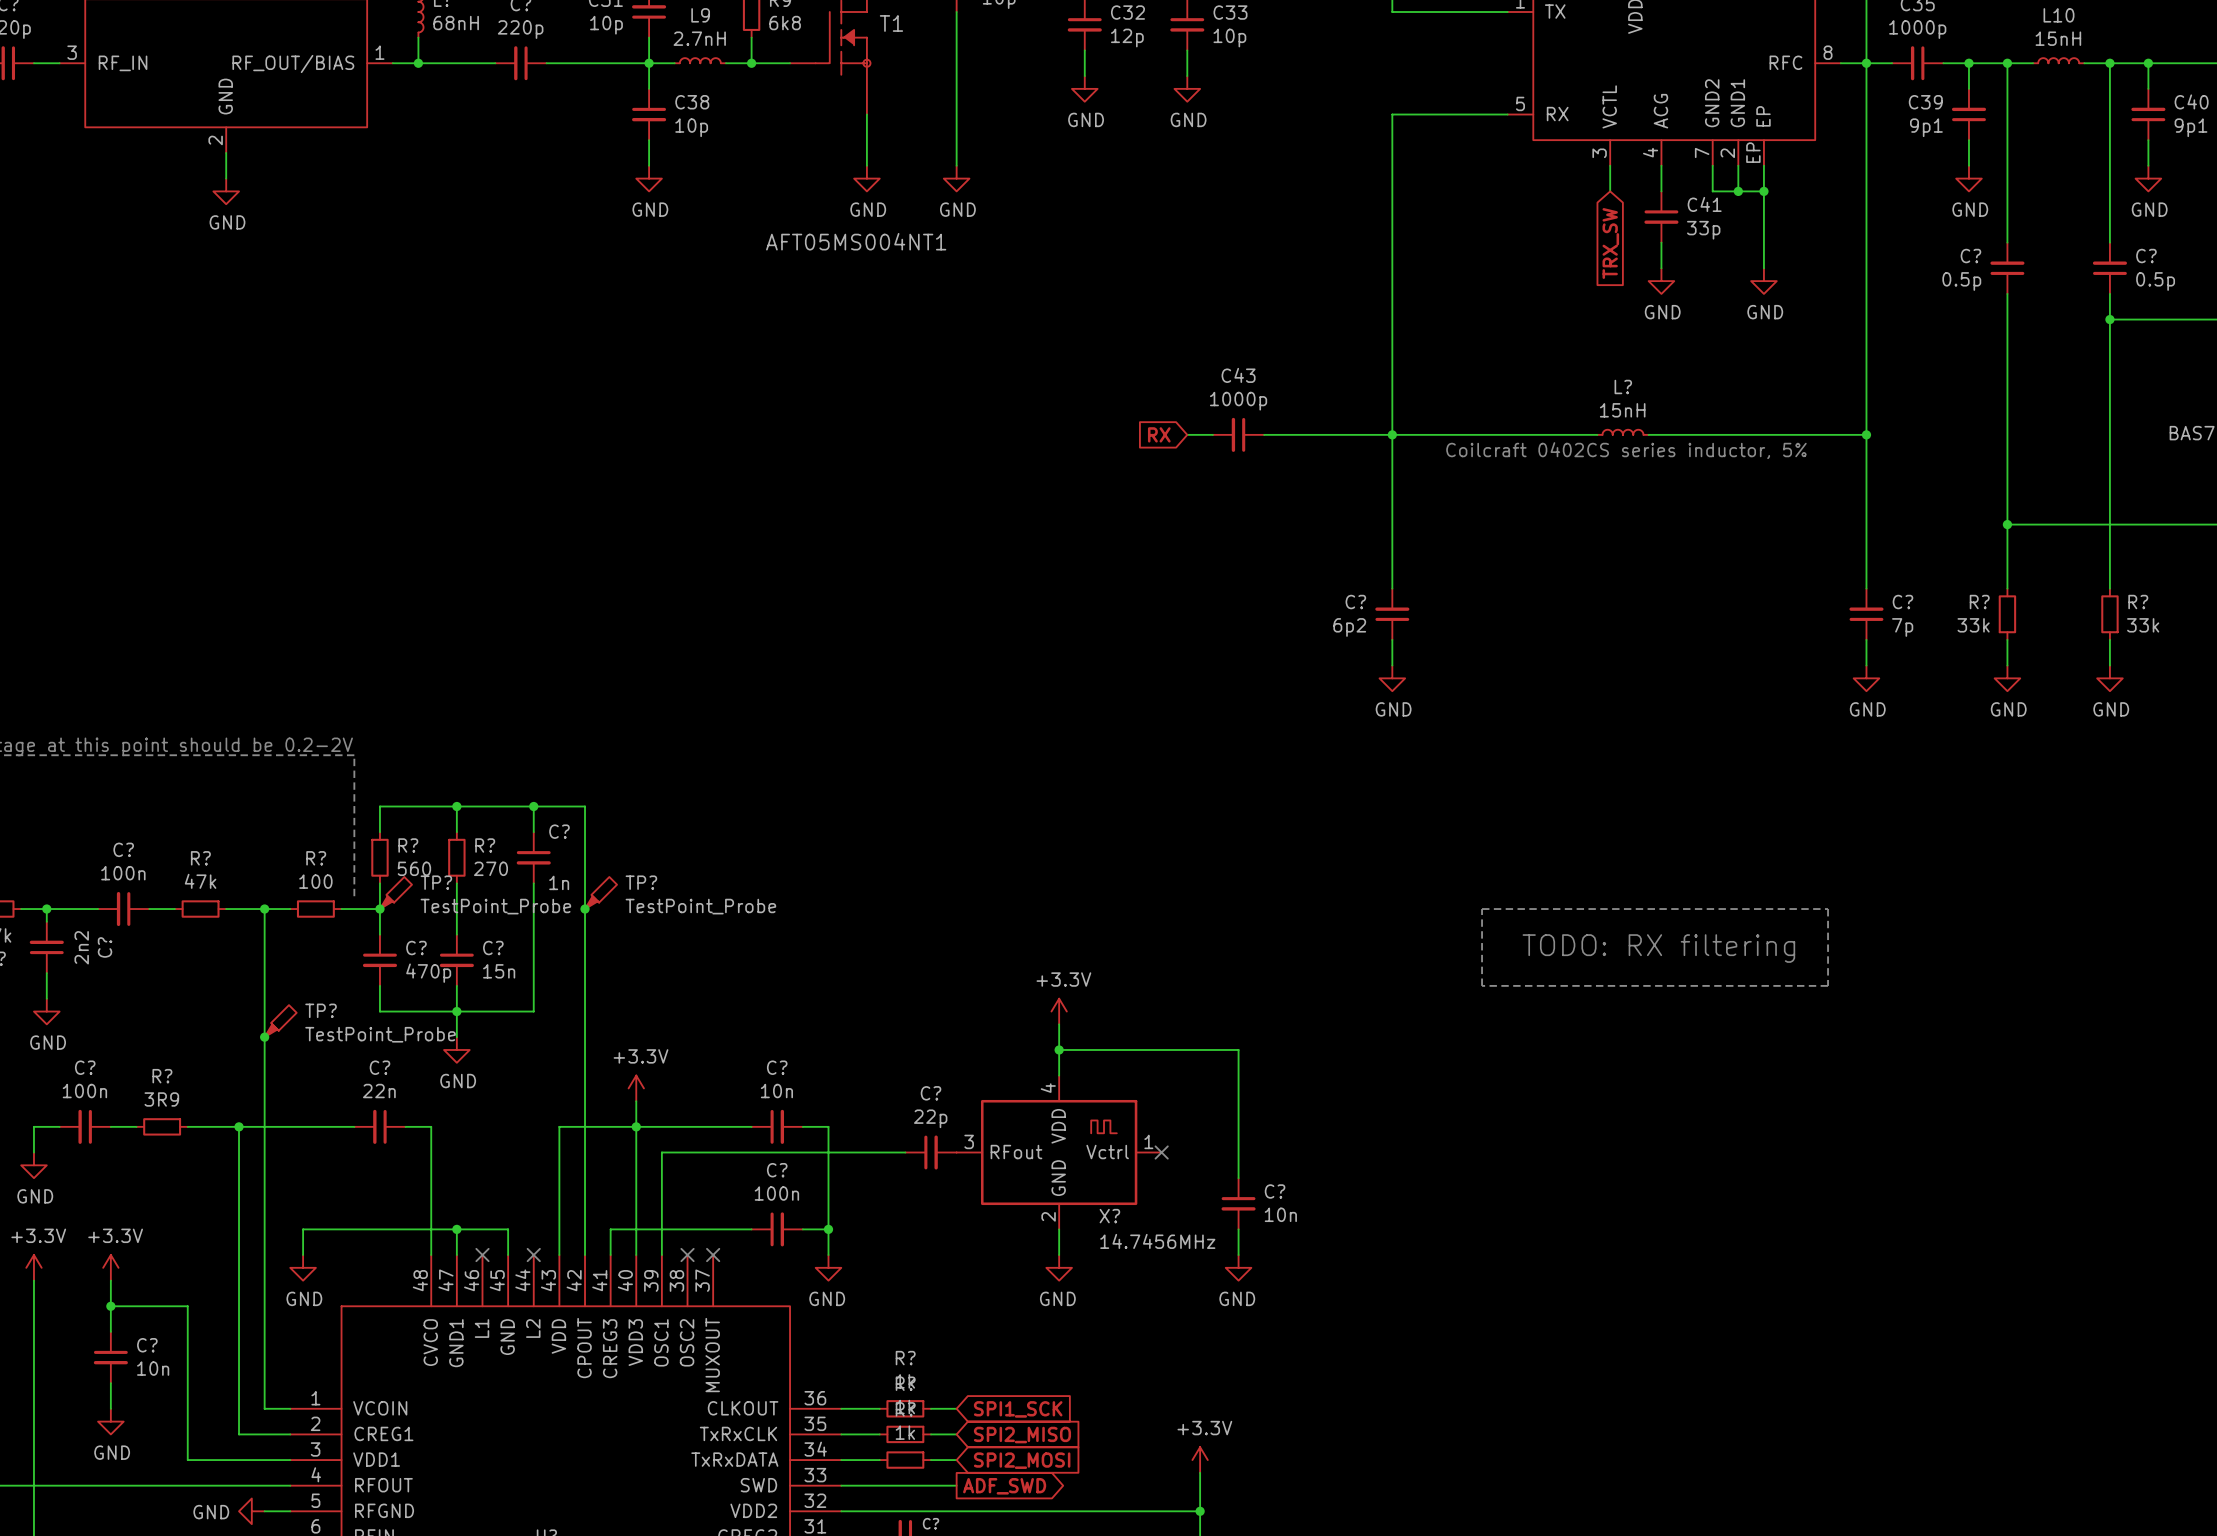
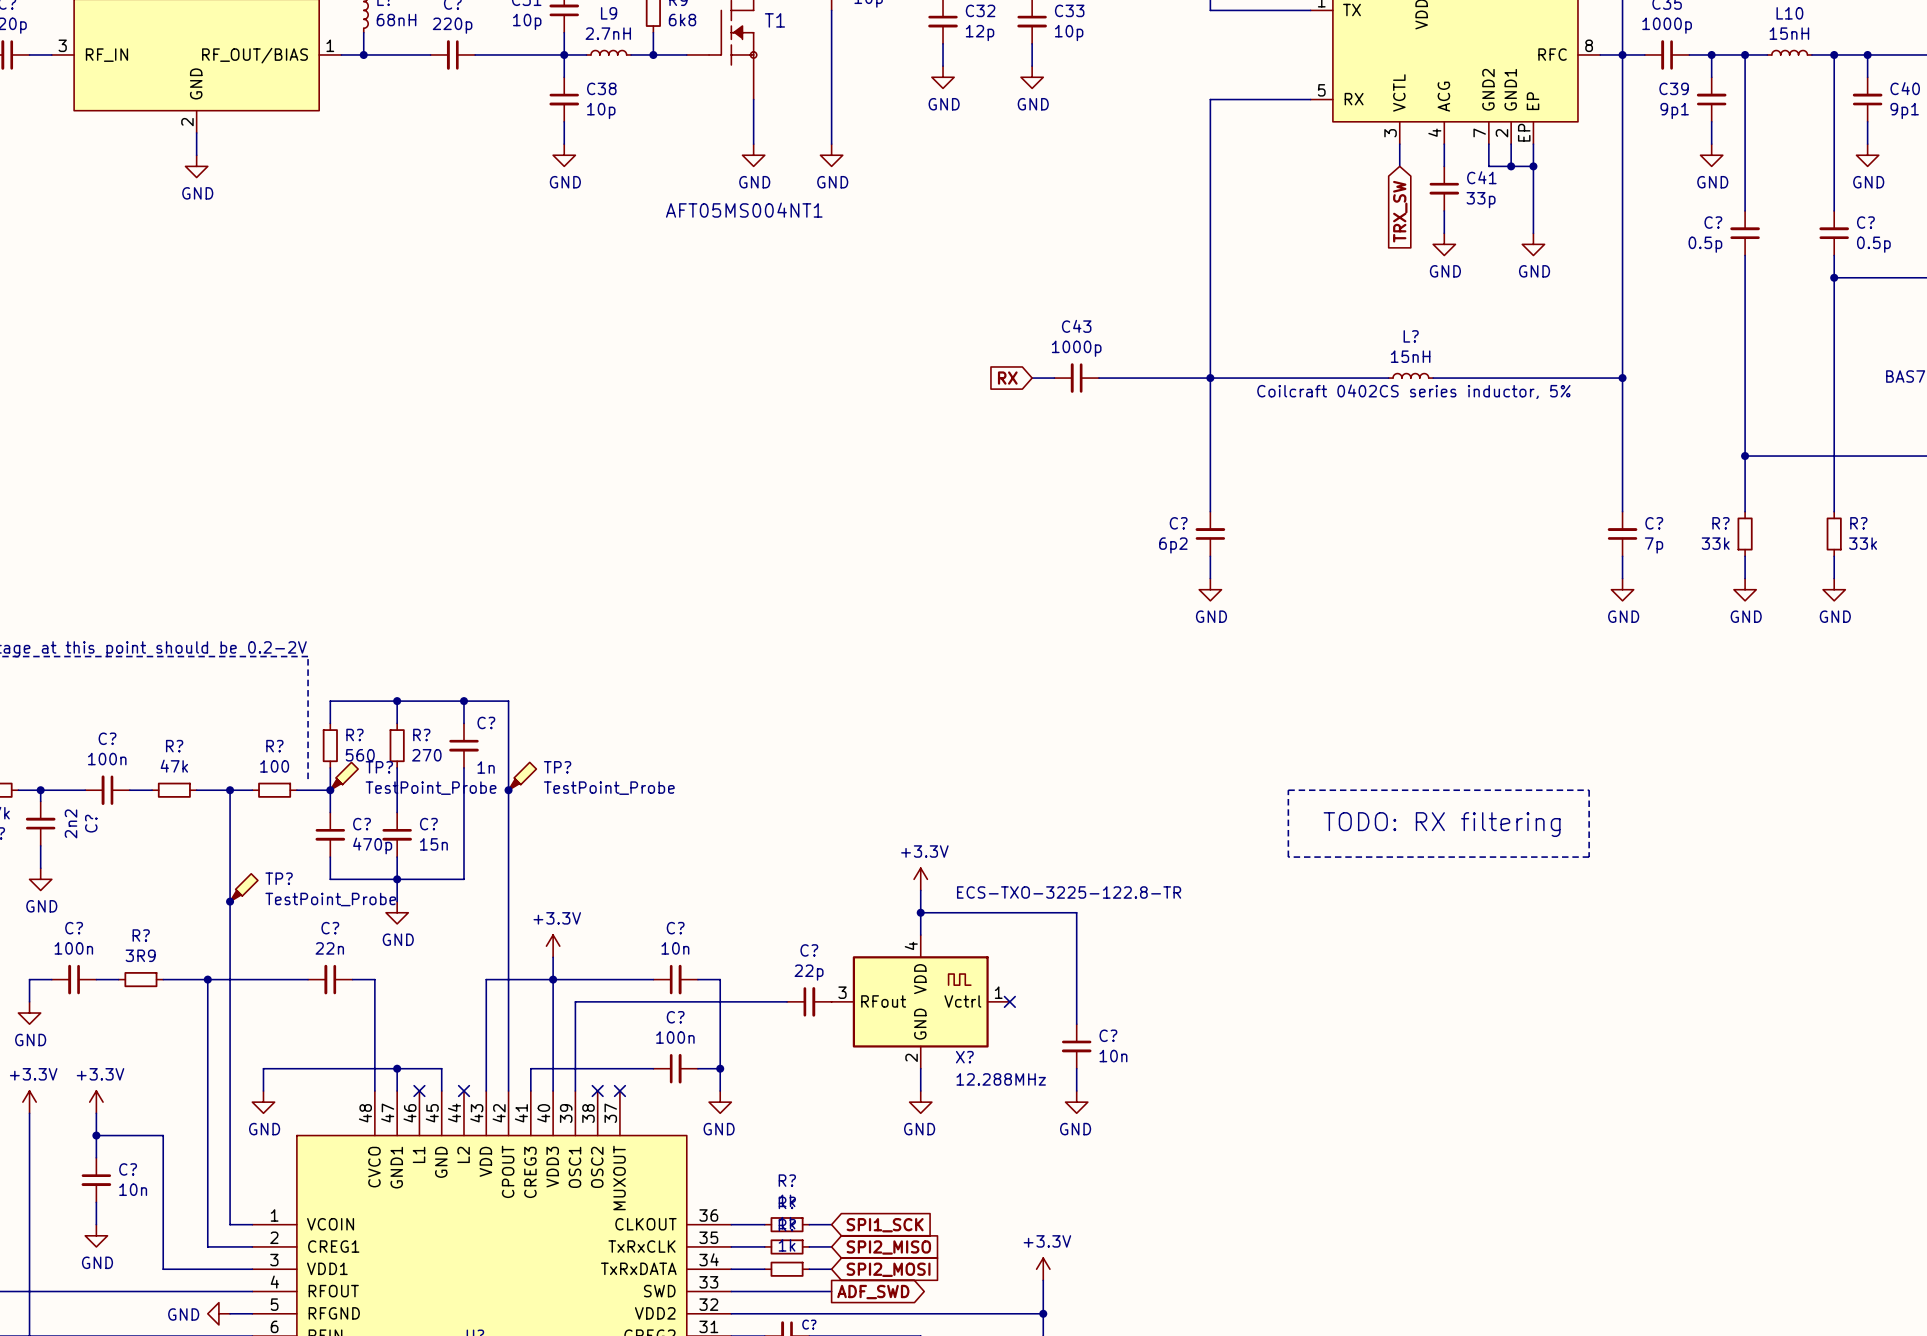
text: none -> ECS-TXO-3225-122.8-TR (1069, 892)
X? value: 14.7456MHz (1157, 1241) -> 12.288MHz (1001, 1079)

